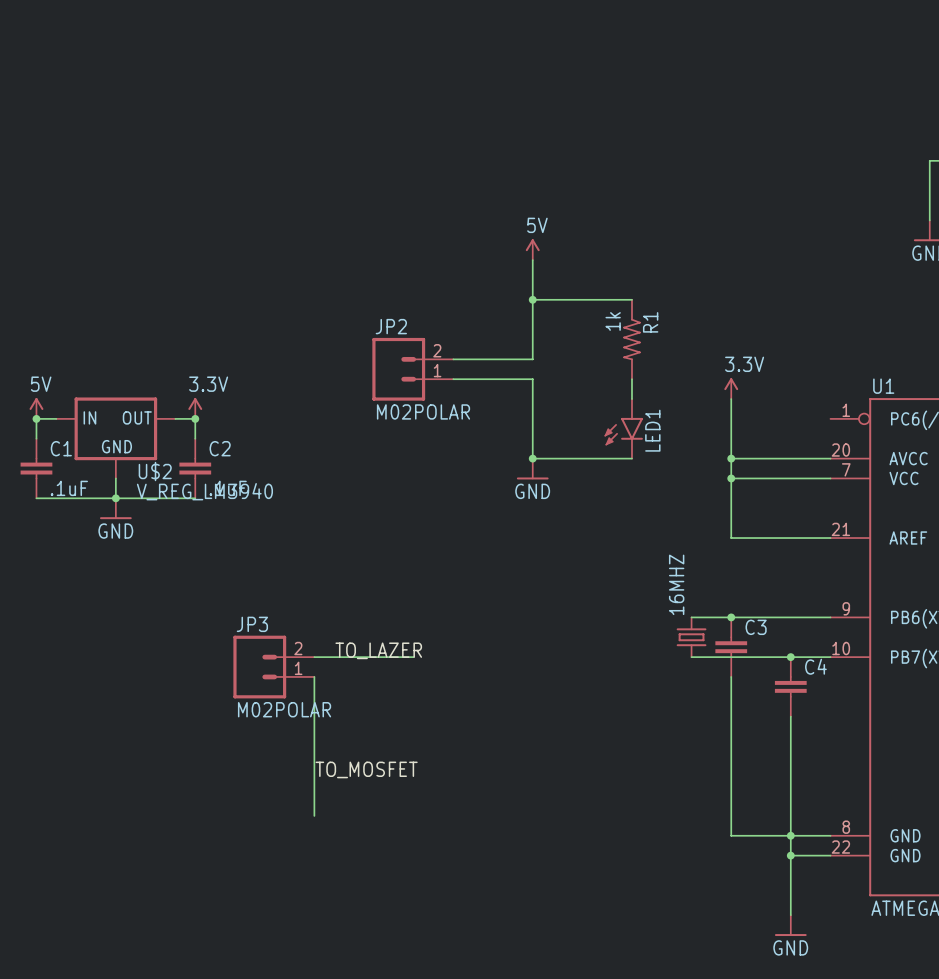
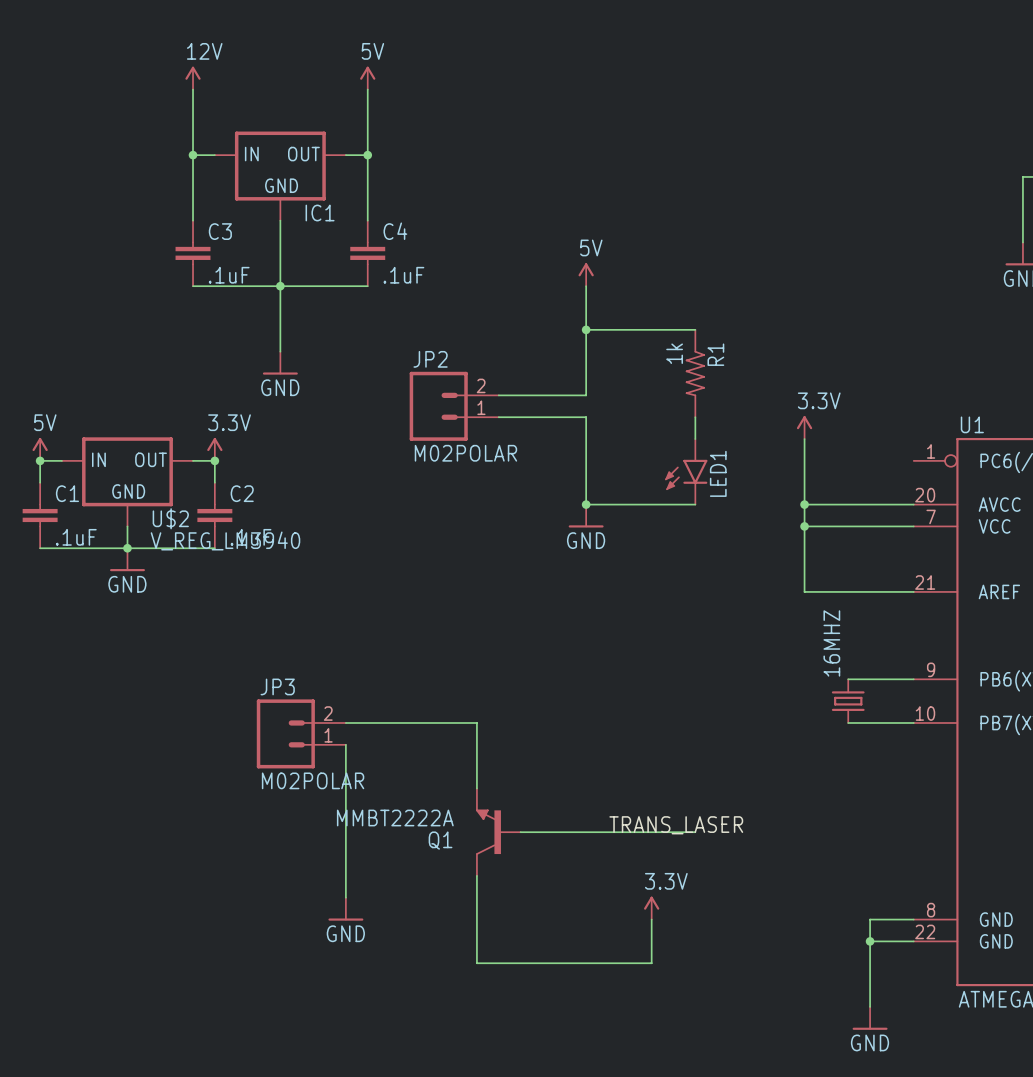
power symbol: none -> 12V (193, 78)
power symbol: none -> 5V (367, 78)
wire: none -> (193, 89) (193, 220)
wire: none -> (367, 89) (367, 220)
wire: none -> (193, 155) (214, 155)
junction: none -> (193, 155)
wire: none -> (345, 155) (367, 155)
junction: none -> (367, 155)
IC1: none -> (280, 176)
wire: none -> (280, 220) (280, 351)
C3 value: none -> .1uF (229, 275)
C4 value: none -> .1uF (403, 275)
wire: none -> (193, 286) (367, 286)
junction: none -> (280, 286)
power symbol: none -> GND (280, 363)
wire: (691, 617) (770, 617) -> none
junction: (731, 617) -> none
16MHZ position: (691, 637) -> (848, 701)
C3 position: (731, 647) -> (193, 253)
label: TO_LAZER (378, 650) -> none
wire: none -> (455, 722) (476, 722) (476, 788)
wire: (691, 657) (770, 657) -> none
junction: (790, 657) -> none
wire: (731, 676) (731, 835) (790, 835) (790, 716) -> none
C4 position: (790, 686) -> (367, 253)
label: none -> TRANS_LASER (676, 825)
Q1: none -> MMBT2222A (498, 832)
wire: none -> (520, 832) (695, 832)
label: TO_MOSFET (366, 769) -> none
wire: none -> (476, 875) (476, 963) (651, 963) (651, 919)
power symbol: none -> 3.3V (651, 908)
power symbol: none -> GND (345, 909)
junction: (790, 835) -> none

